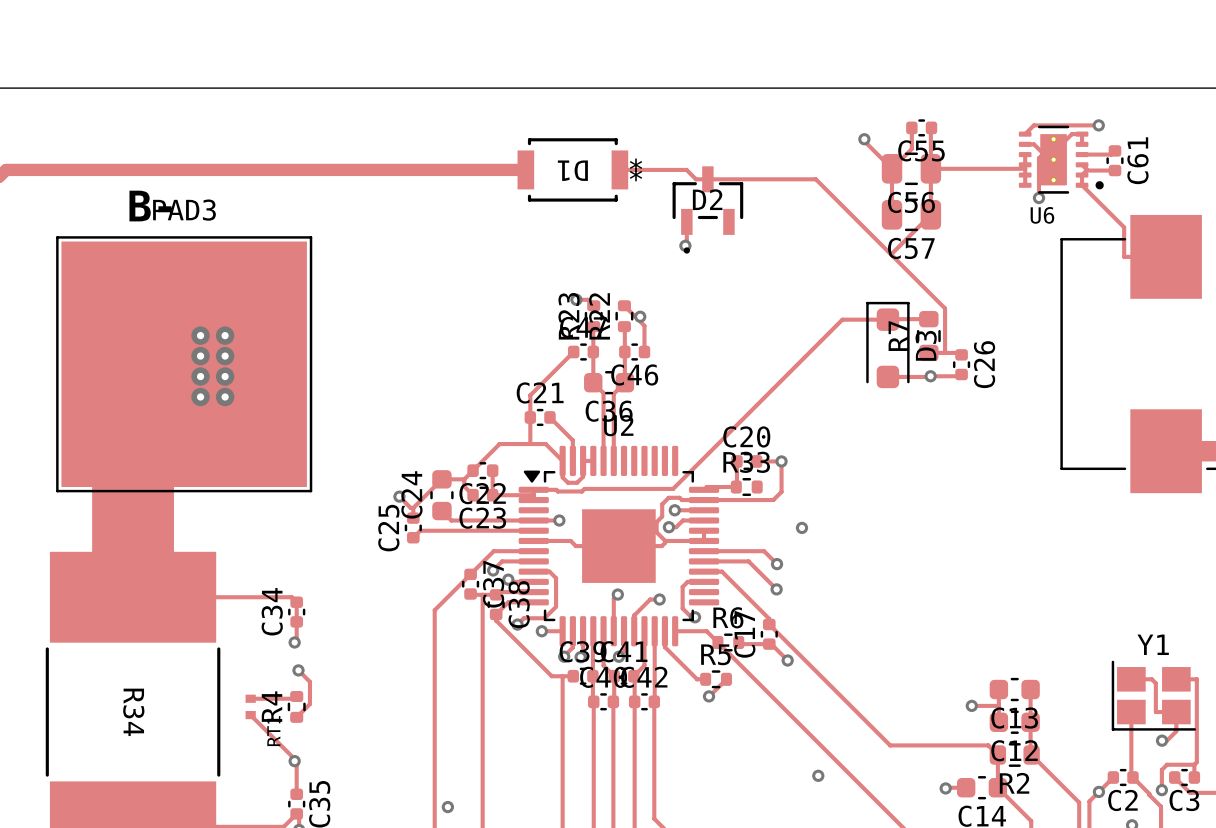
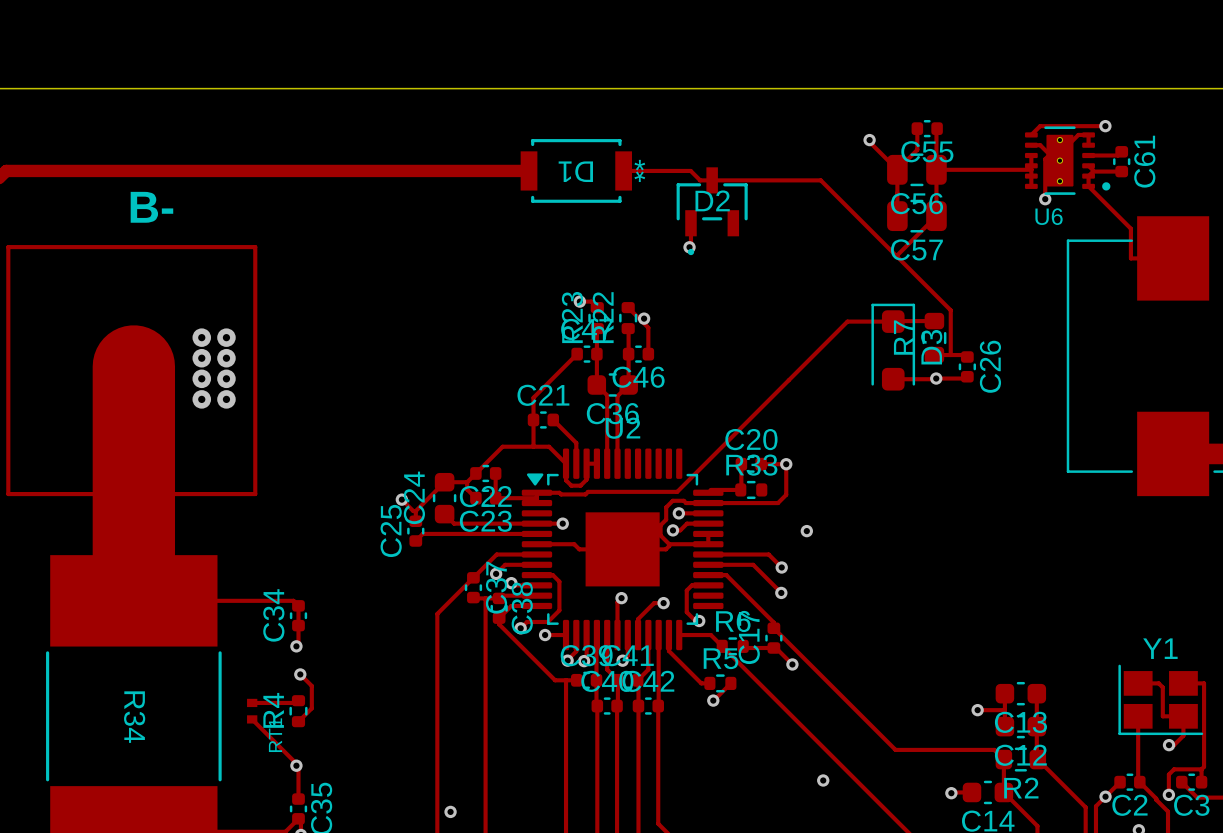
track: none -> (8, 247) (255, 247) (255, 494) (8, 494) (8, 247)
PAD3: (184, 364) -> none

